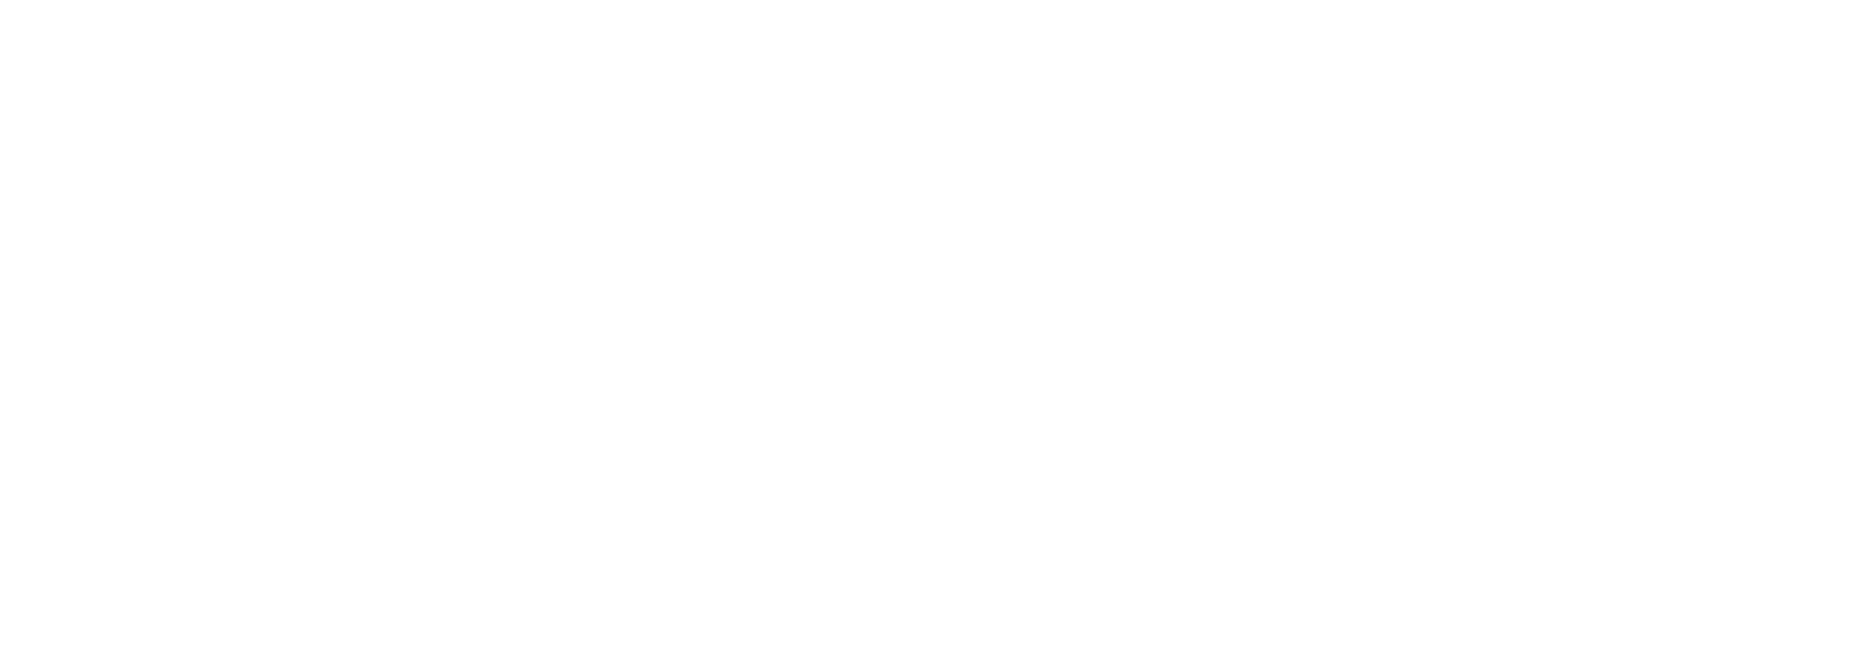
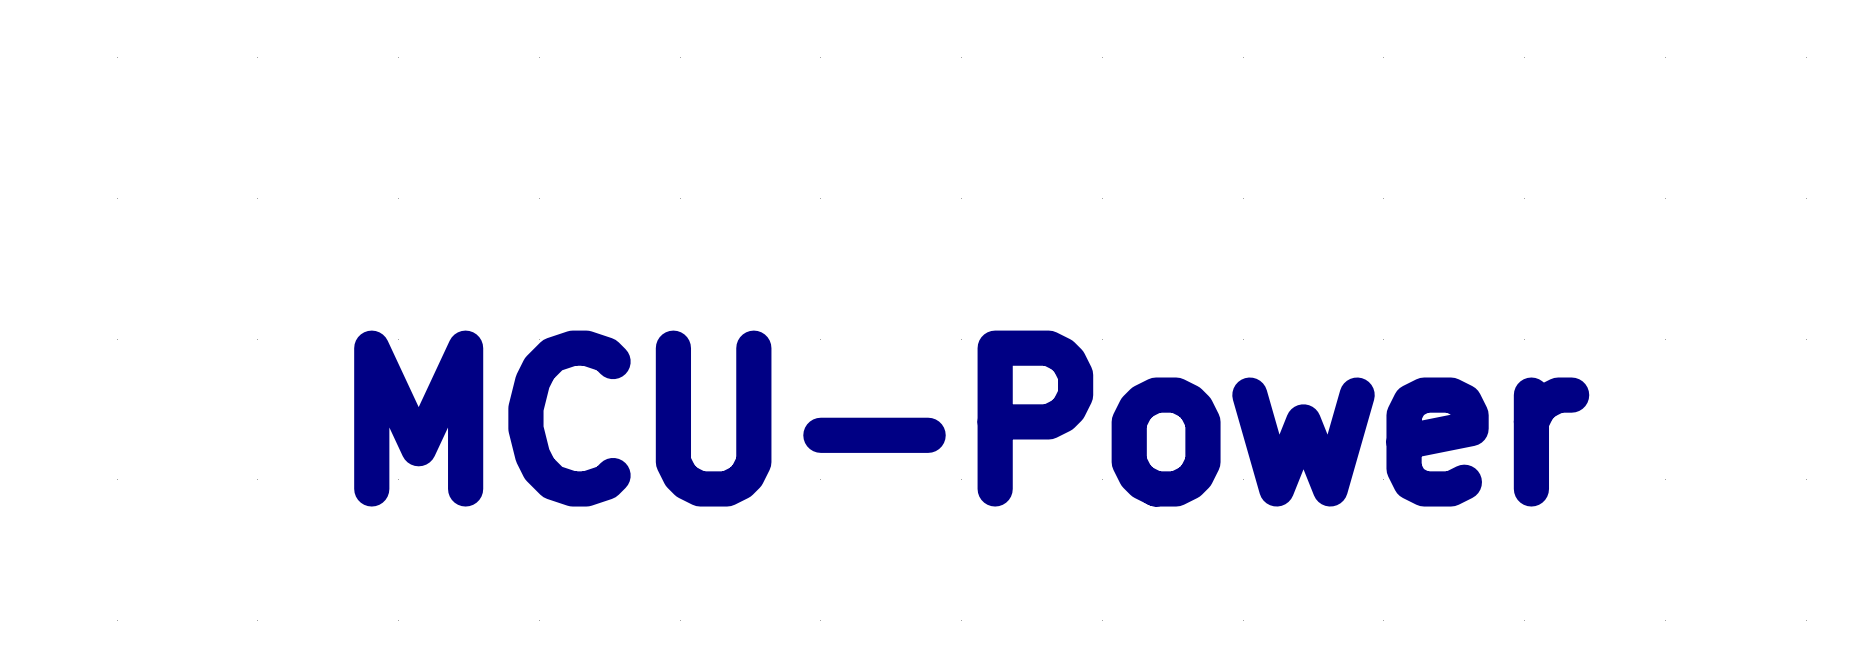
text: none -> MCU-Power (971, 418)

